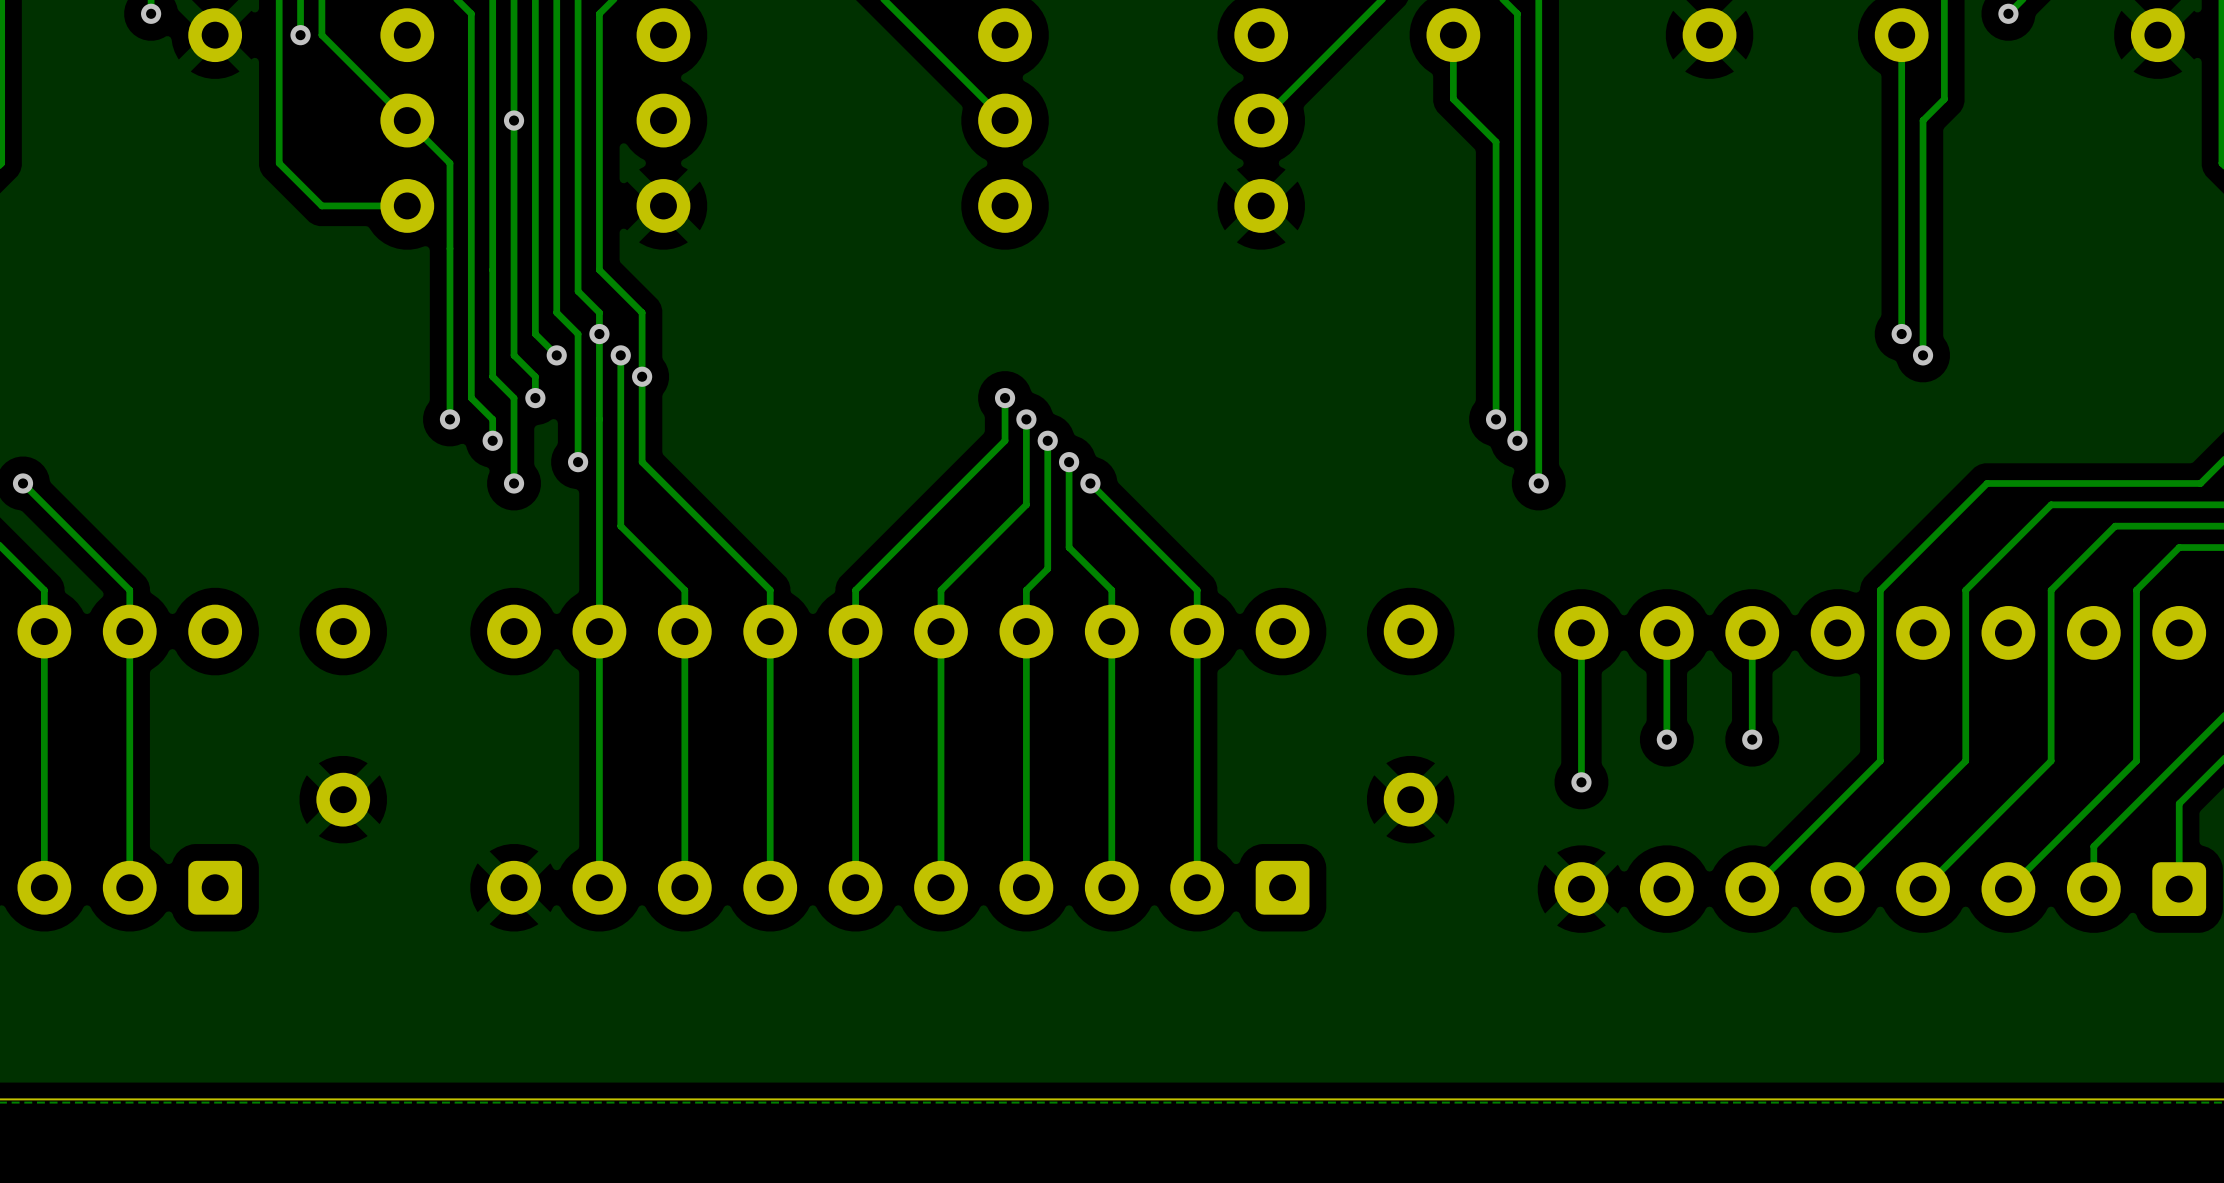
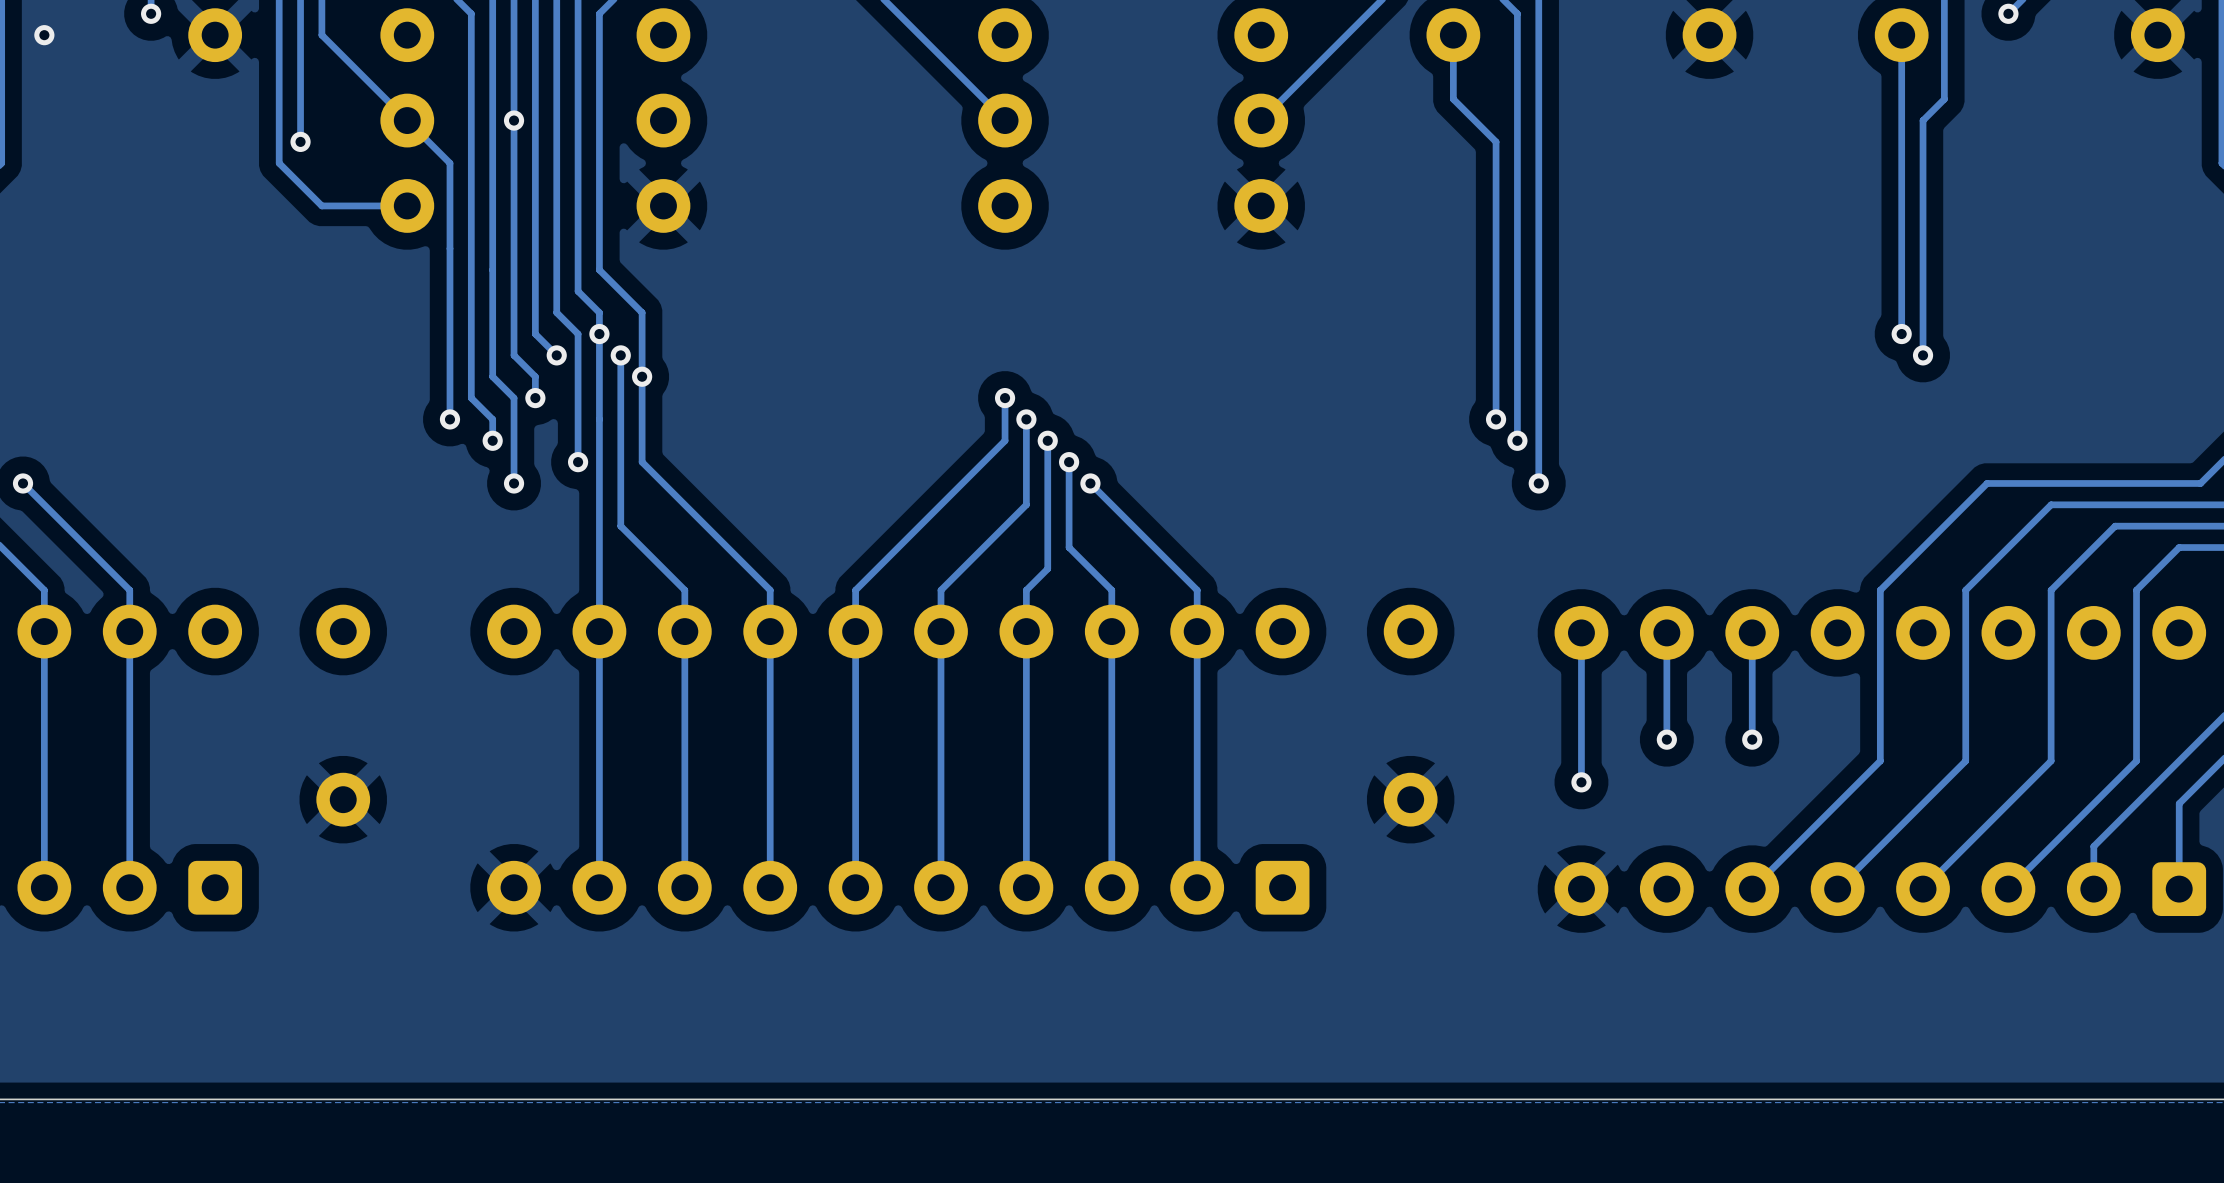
via: none -> (44, 35)
track: none -> (300, 35) (300, 141)
via position: (300, 35) -> (300, 141)

